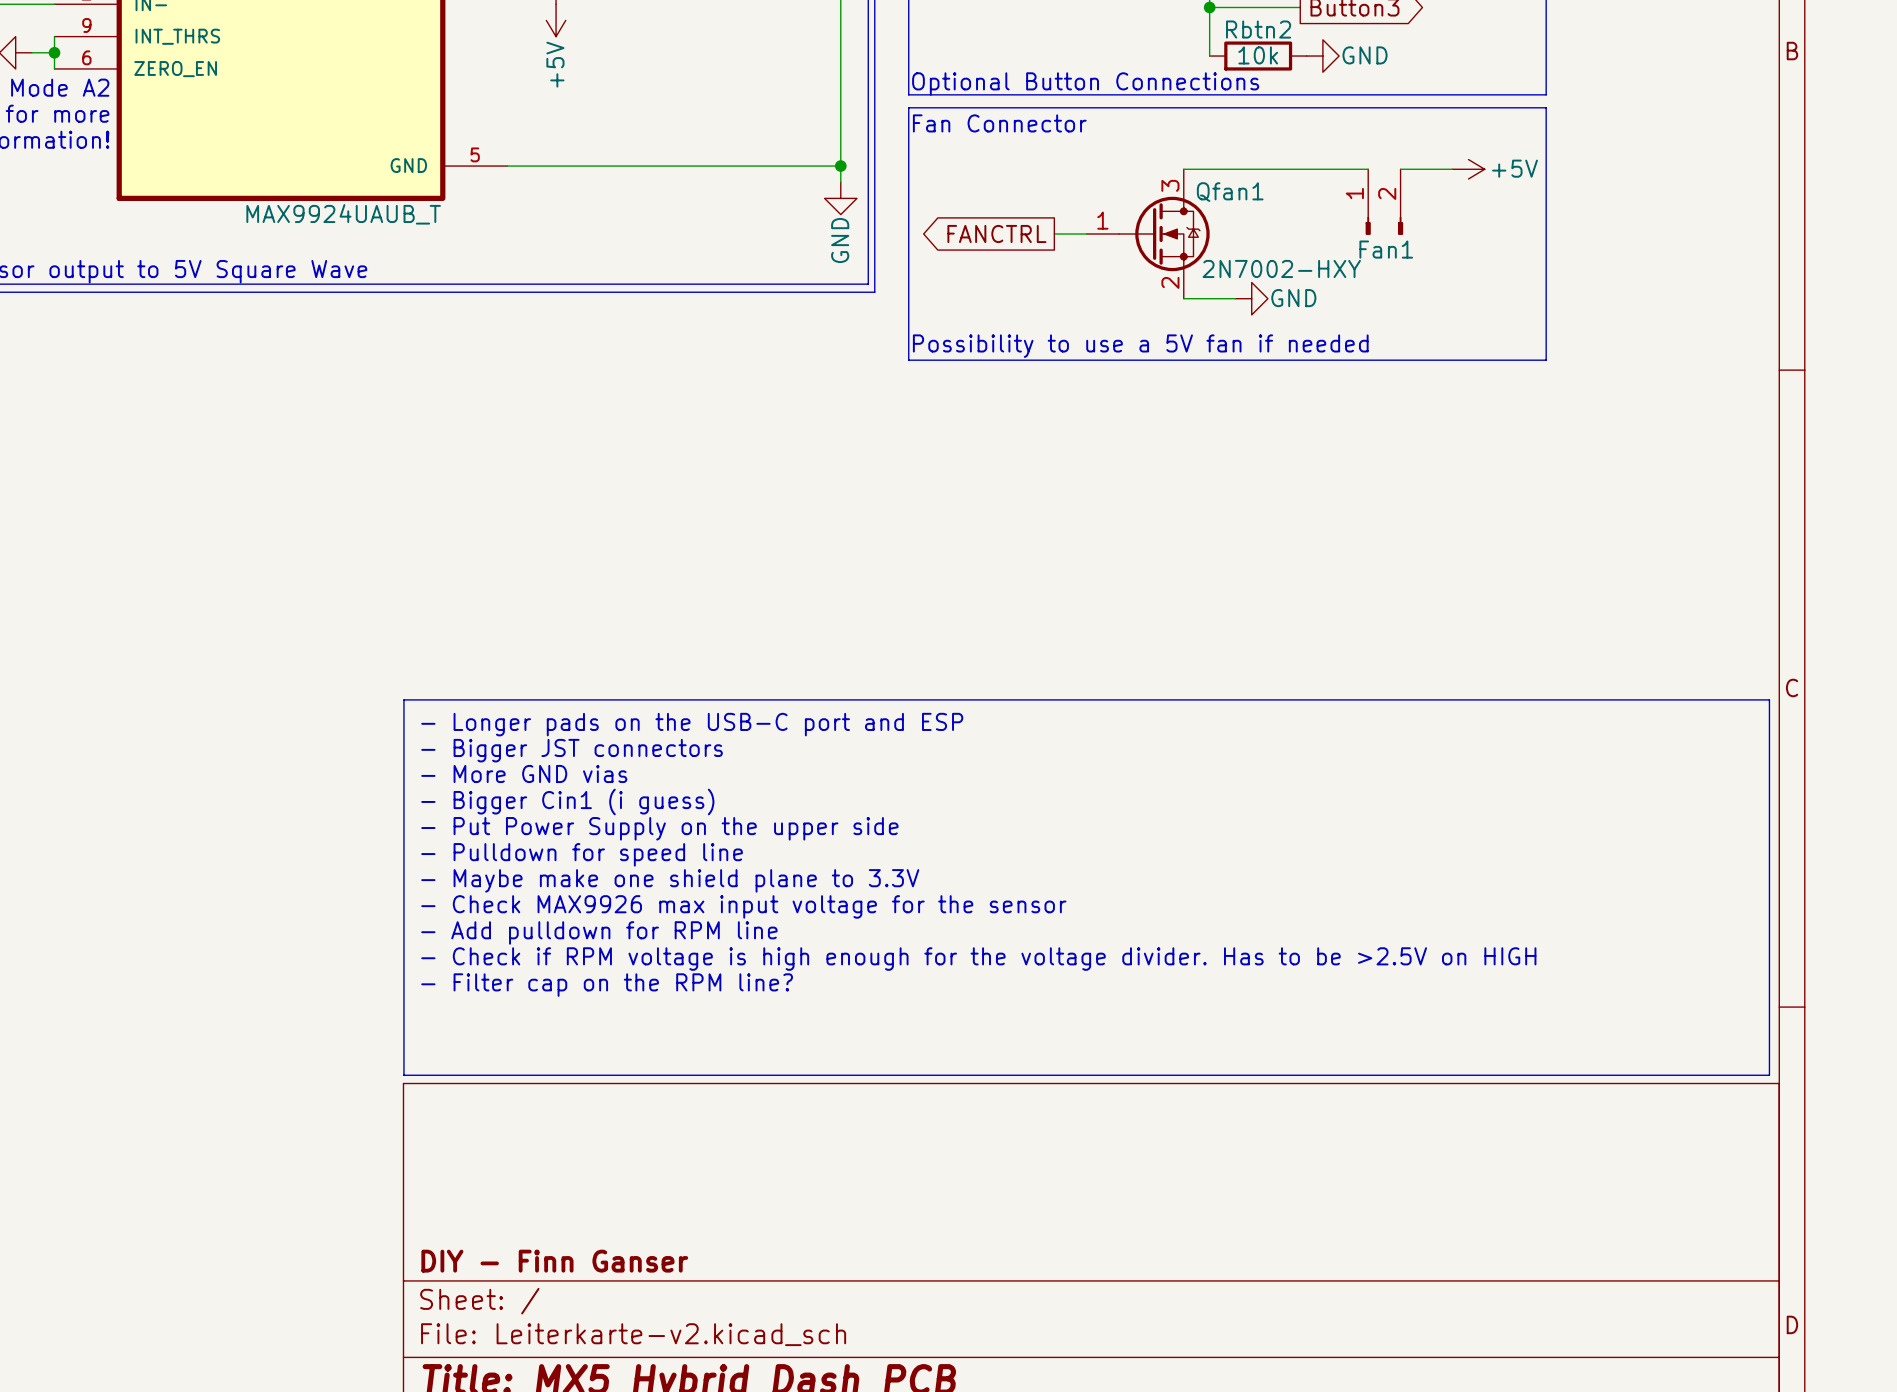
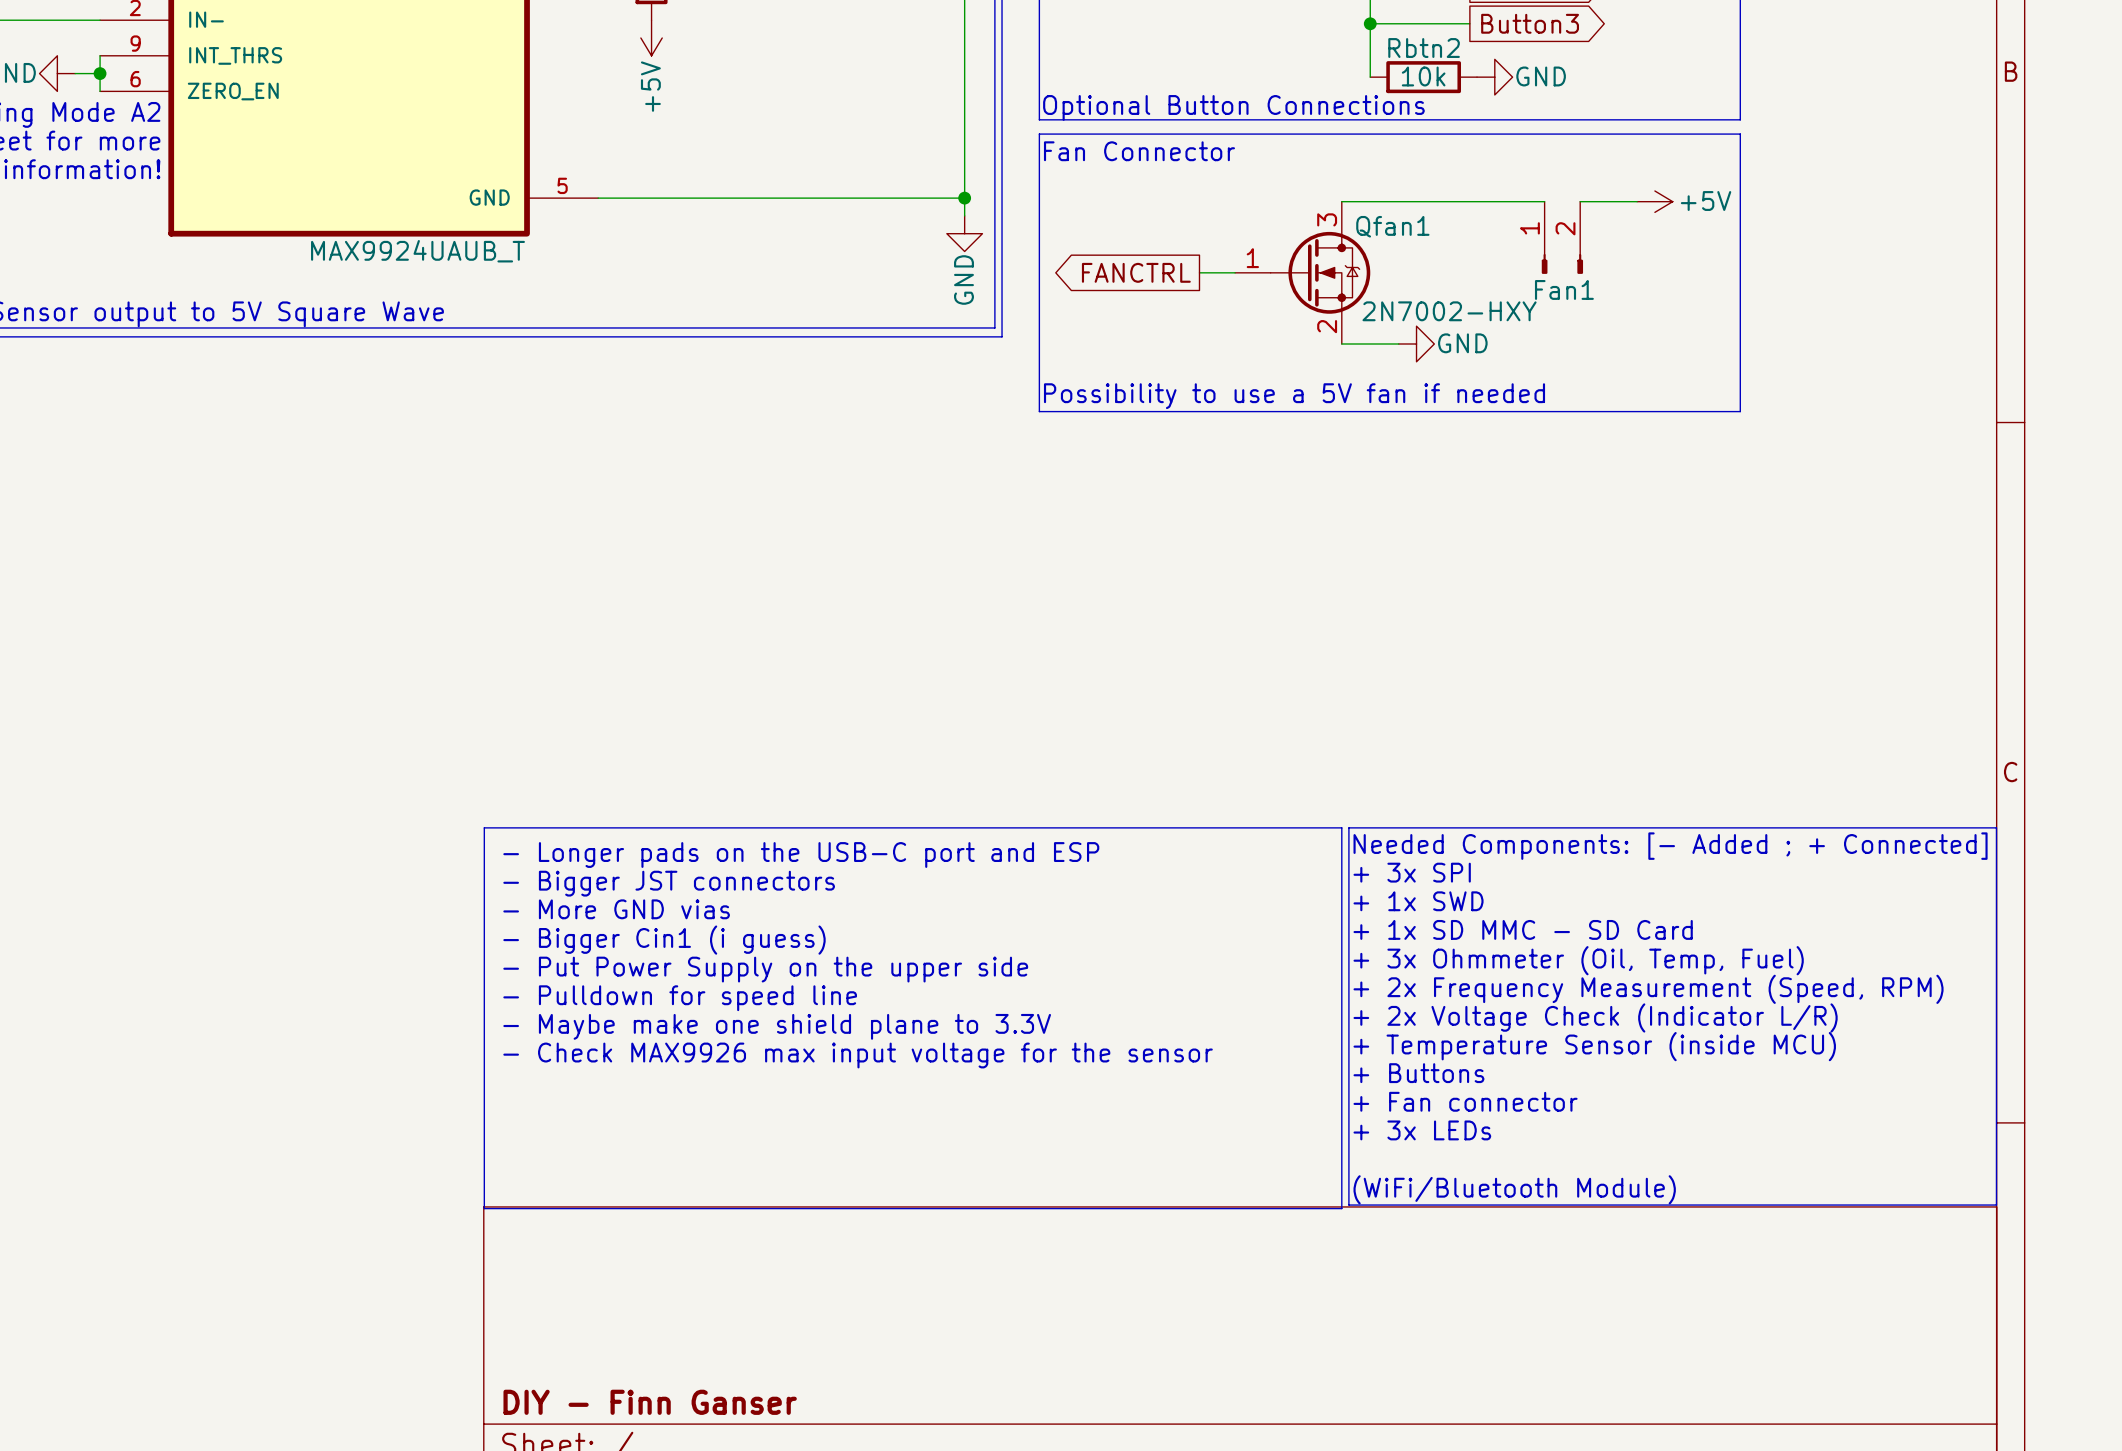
text position: - Longer pads on the USB-C port and ESP (692, 724) -> - Longer pads on the USB-C port and ESP (801, 855)
line: (403, 738) (403, 699) (1769, 699) (1769, 1075) (403, 1075) -> (484, 827) (1341, 827) (1341, 1208) (484, 1208) (484, 1197)
line: none -> (1348, 827) (1996, 827) (1996, 1205) (1348, 1205) (1348, 827)
text position: - Bigger JST connectors (572, 750) -> - Bigger JST connectors (669, 883)
text: none -> Needed Components: [- Added ; + Connected] (1670, 846)
text position: - More GND vias (524, 773) -> - More GND vias (616, 909)
text: none -> + 3x SPI (1412, 872)
text position: - Bigger Cin1 (i guess) (567, 801) -> - Bigger Cin1 (i guess) (664, 940)
text: none -> + 1x SWD (1418, 901)
text position: - Put Power Supply on the upper side (659, 828) -> - Put Power Supply on the upper side (765, 969)
text: none -> + 1x SD MMC - SD Card (1523, 929)
text position: - Pulldown for speed line (582, 854) -> - Pulldown for speed line (680, 998)
text: none -> + 3x Ohmmeter (Oil, Temp, Fuel) (1578, 960)
text position: - Maybe make one shield plane to 3.3V (670, 880) -> - Maybe make one shield plane to 3.3V (777, 1026)
text: none -> + 2x Frequency Measurement (Speed, RPM) (1648, 989)
text position: - Check MAX9926 max input voltage for the sensor (743, 906) -> - Check MAX9926 max input voltage for the sensor (858, 1055)
text: none -> + 2x Voltage Check (Indicator L/R) (1595, 1017)
text: - Add pulldown for RPM line (599, 932) -> none
text: none -> + Temperature Sensor (inside MCU) (1594, 1046)
text: - Check if RPM voltage is high enough for the voltage divider. Has to be >2.5V on HIGH (978, 959) -> none
text: none -> + Buttons (1418, 1073)
text: - Filter cap on the RPM line? (607, 985) -> none
text: none -> + Fan connector (1465, 1101)
text: none -> + 3x LEDs (1422, 1130)
text: none -> (WiFi/Bluetooth Module) (1514, 1189)

